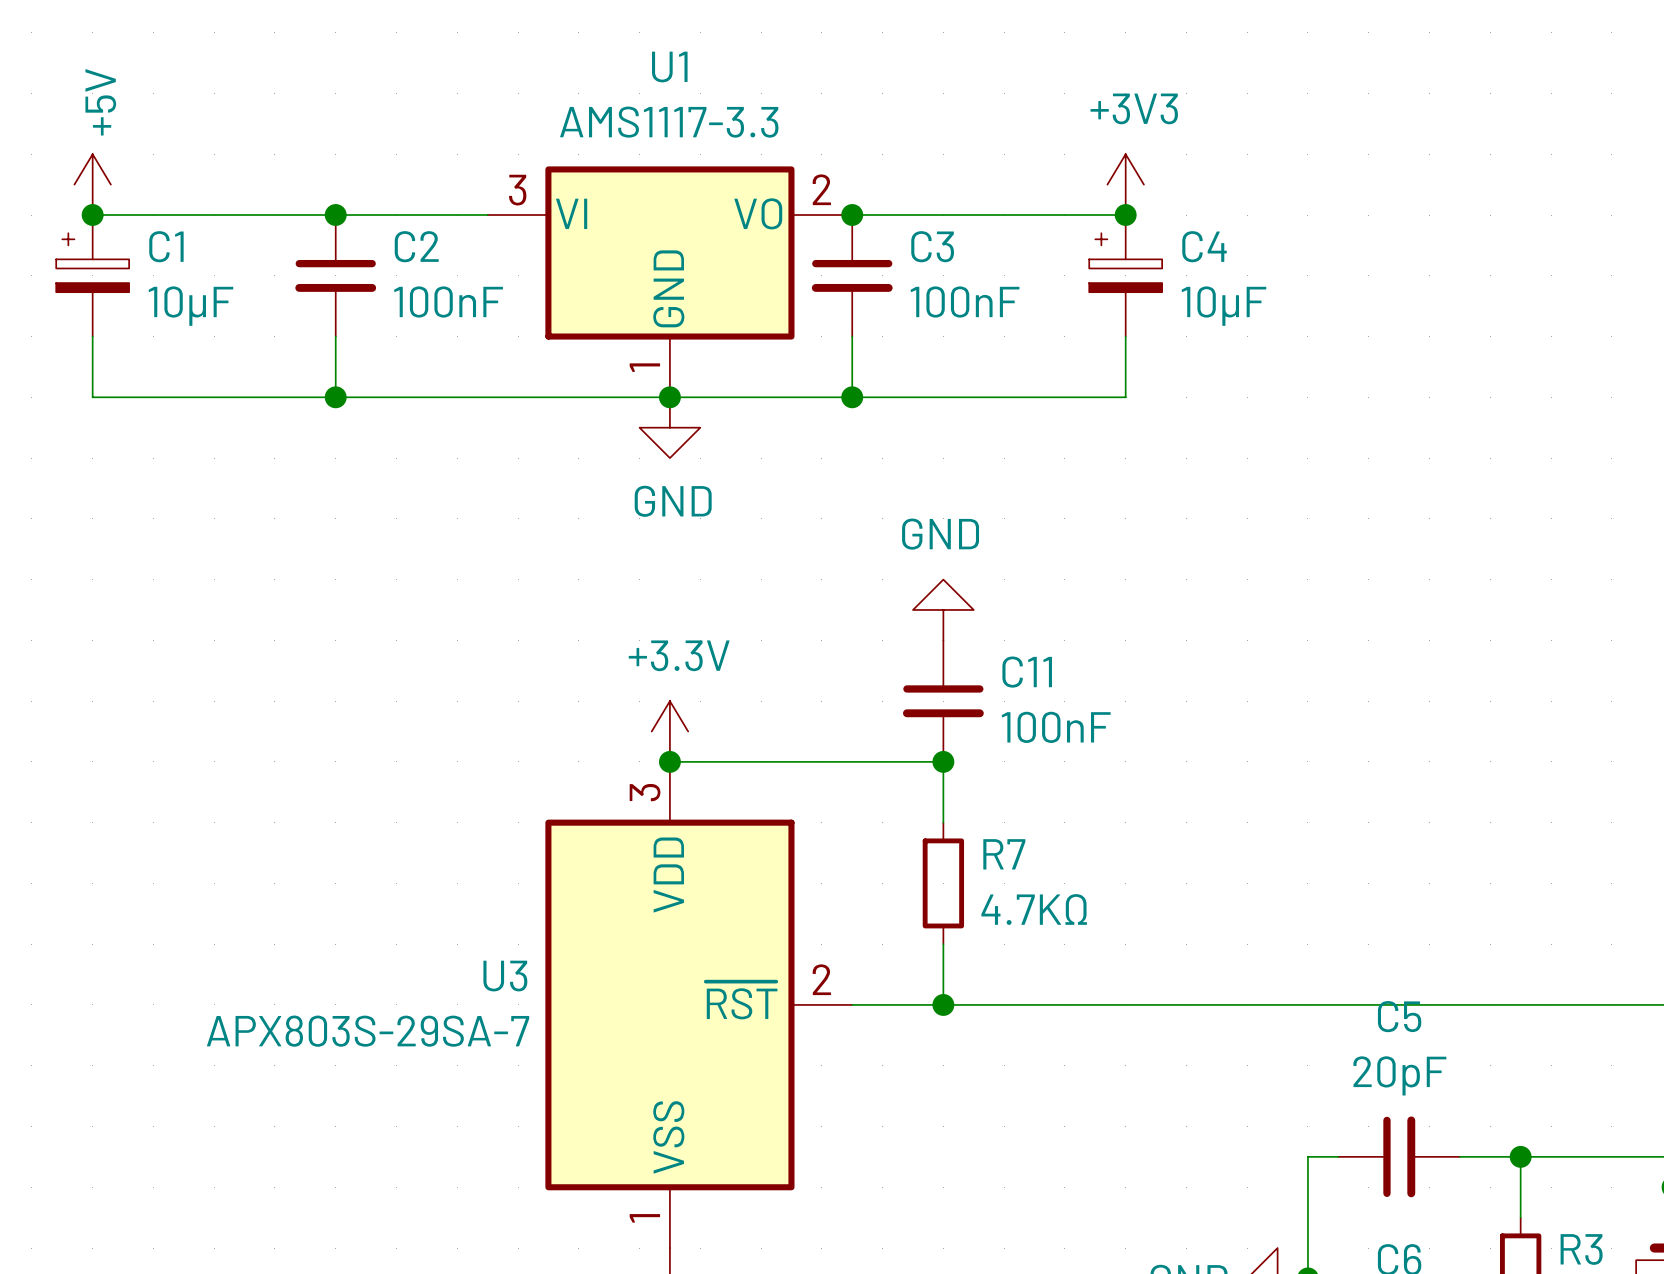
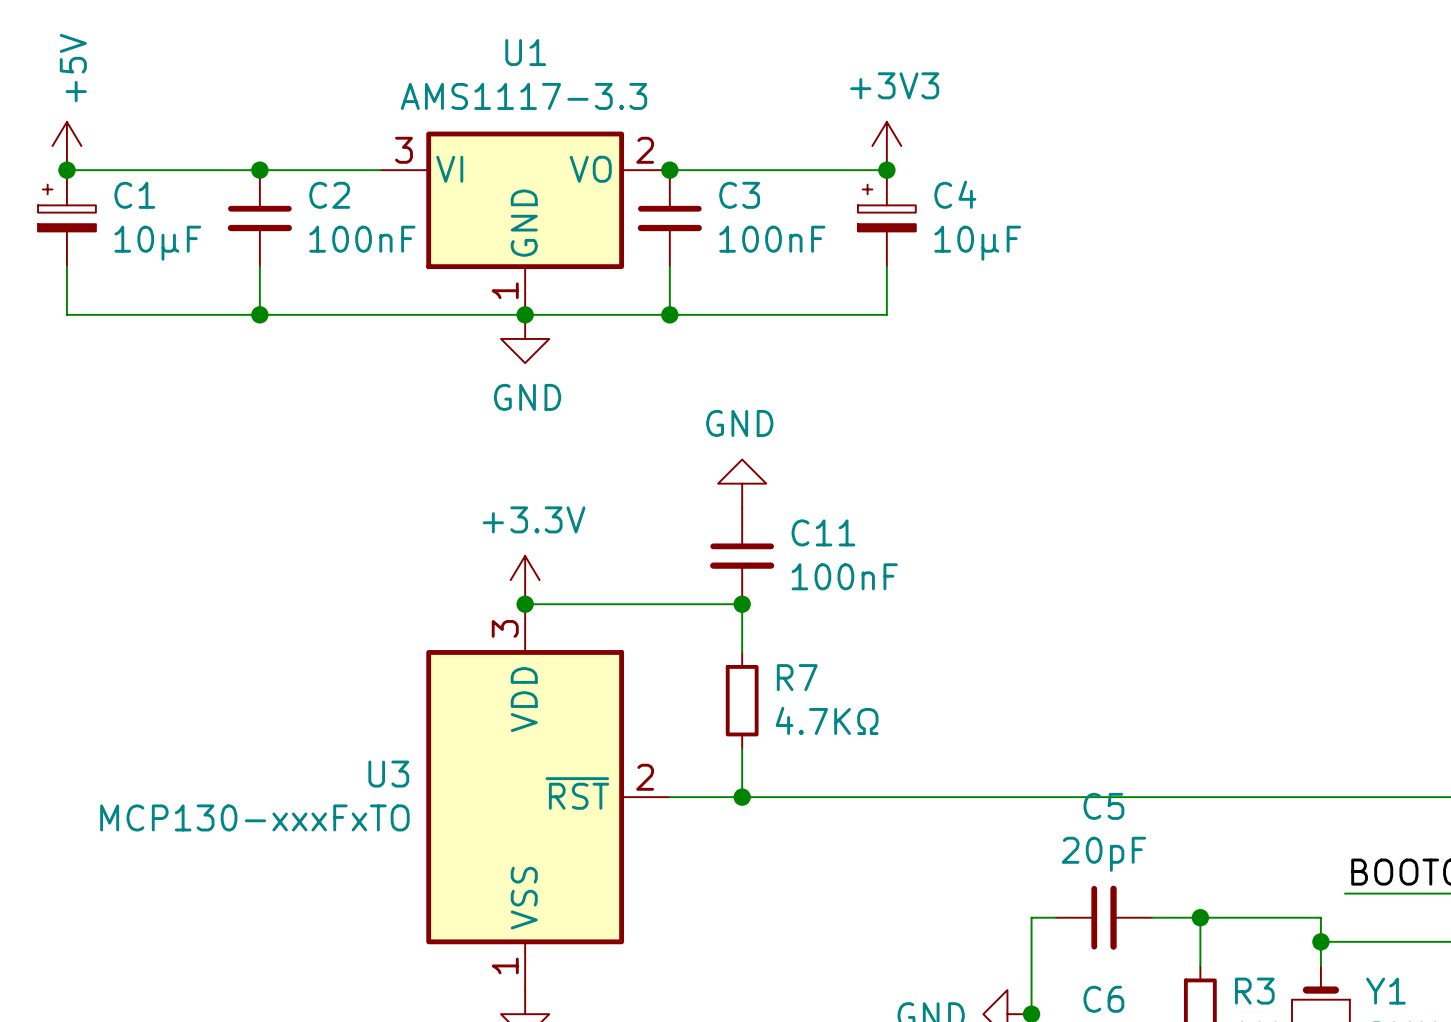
U3 value: APX803S-29SA-7 (368, 1031) -> MCP130-xxxFxTO (254, 817)

